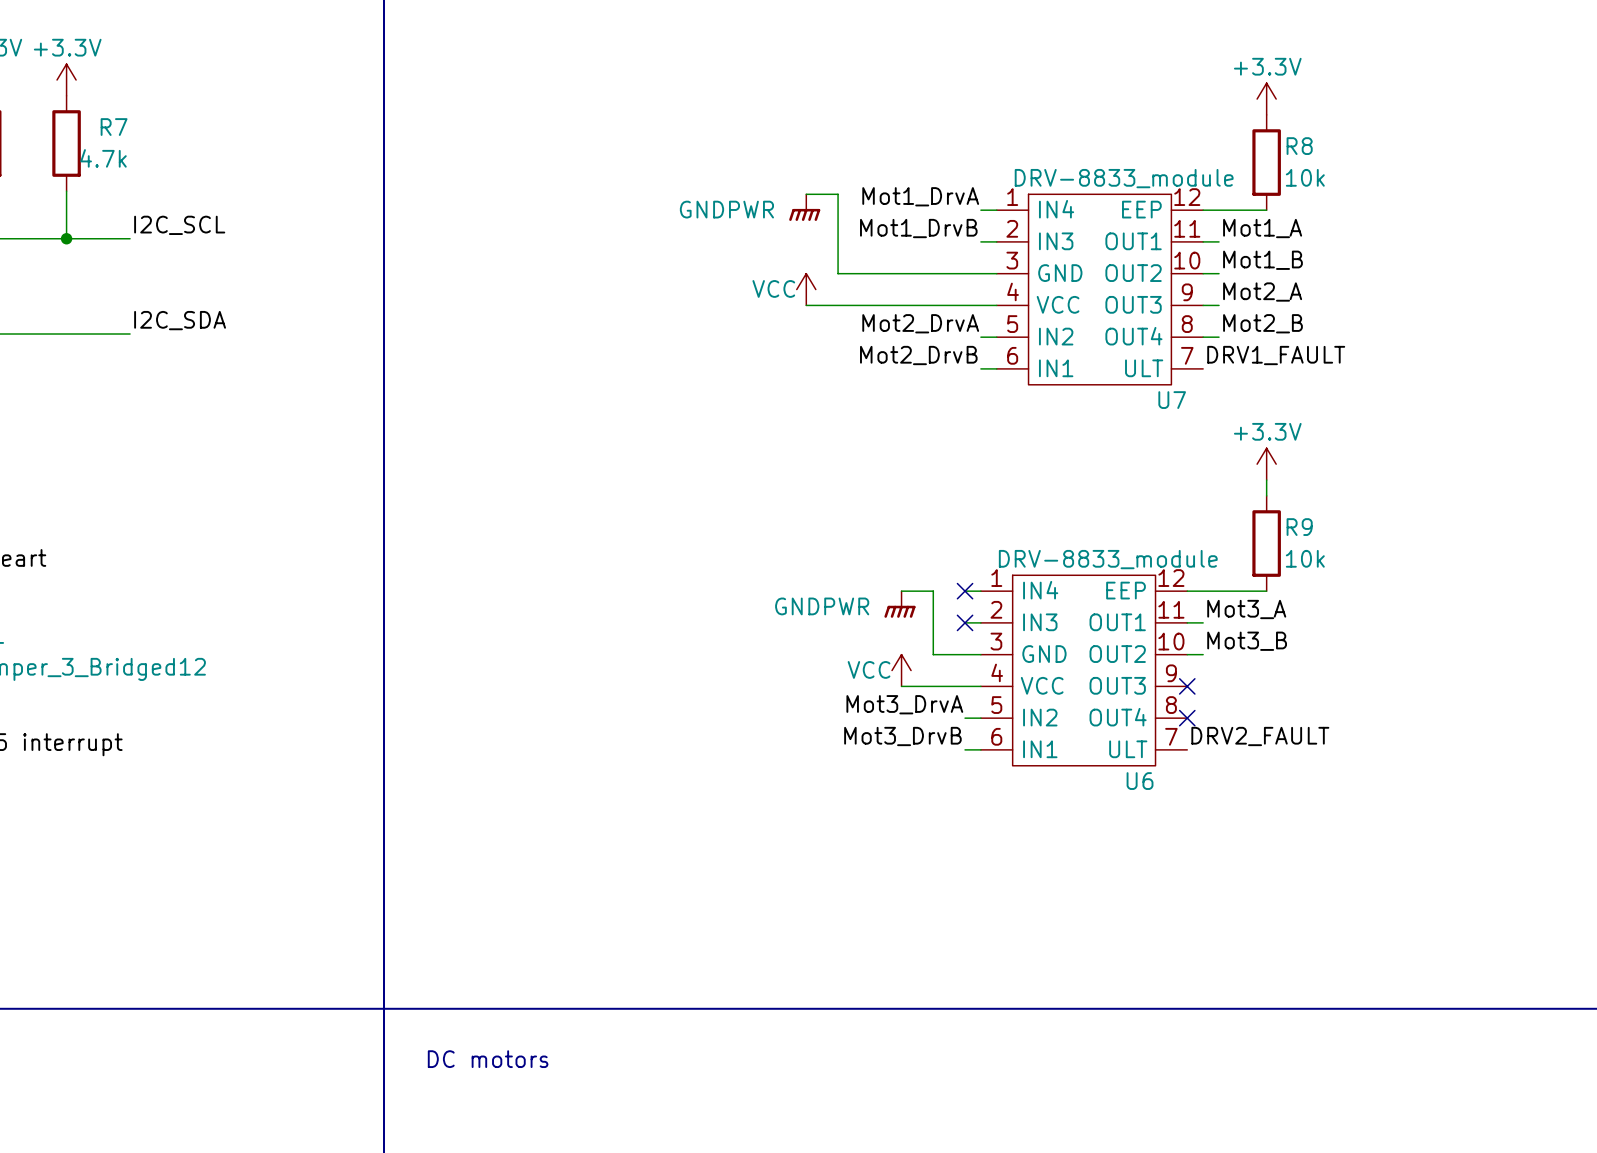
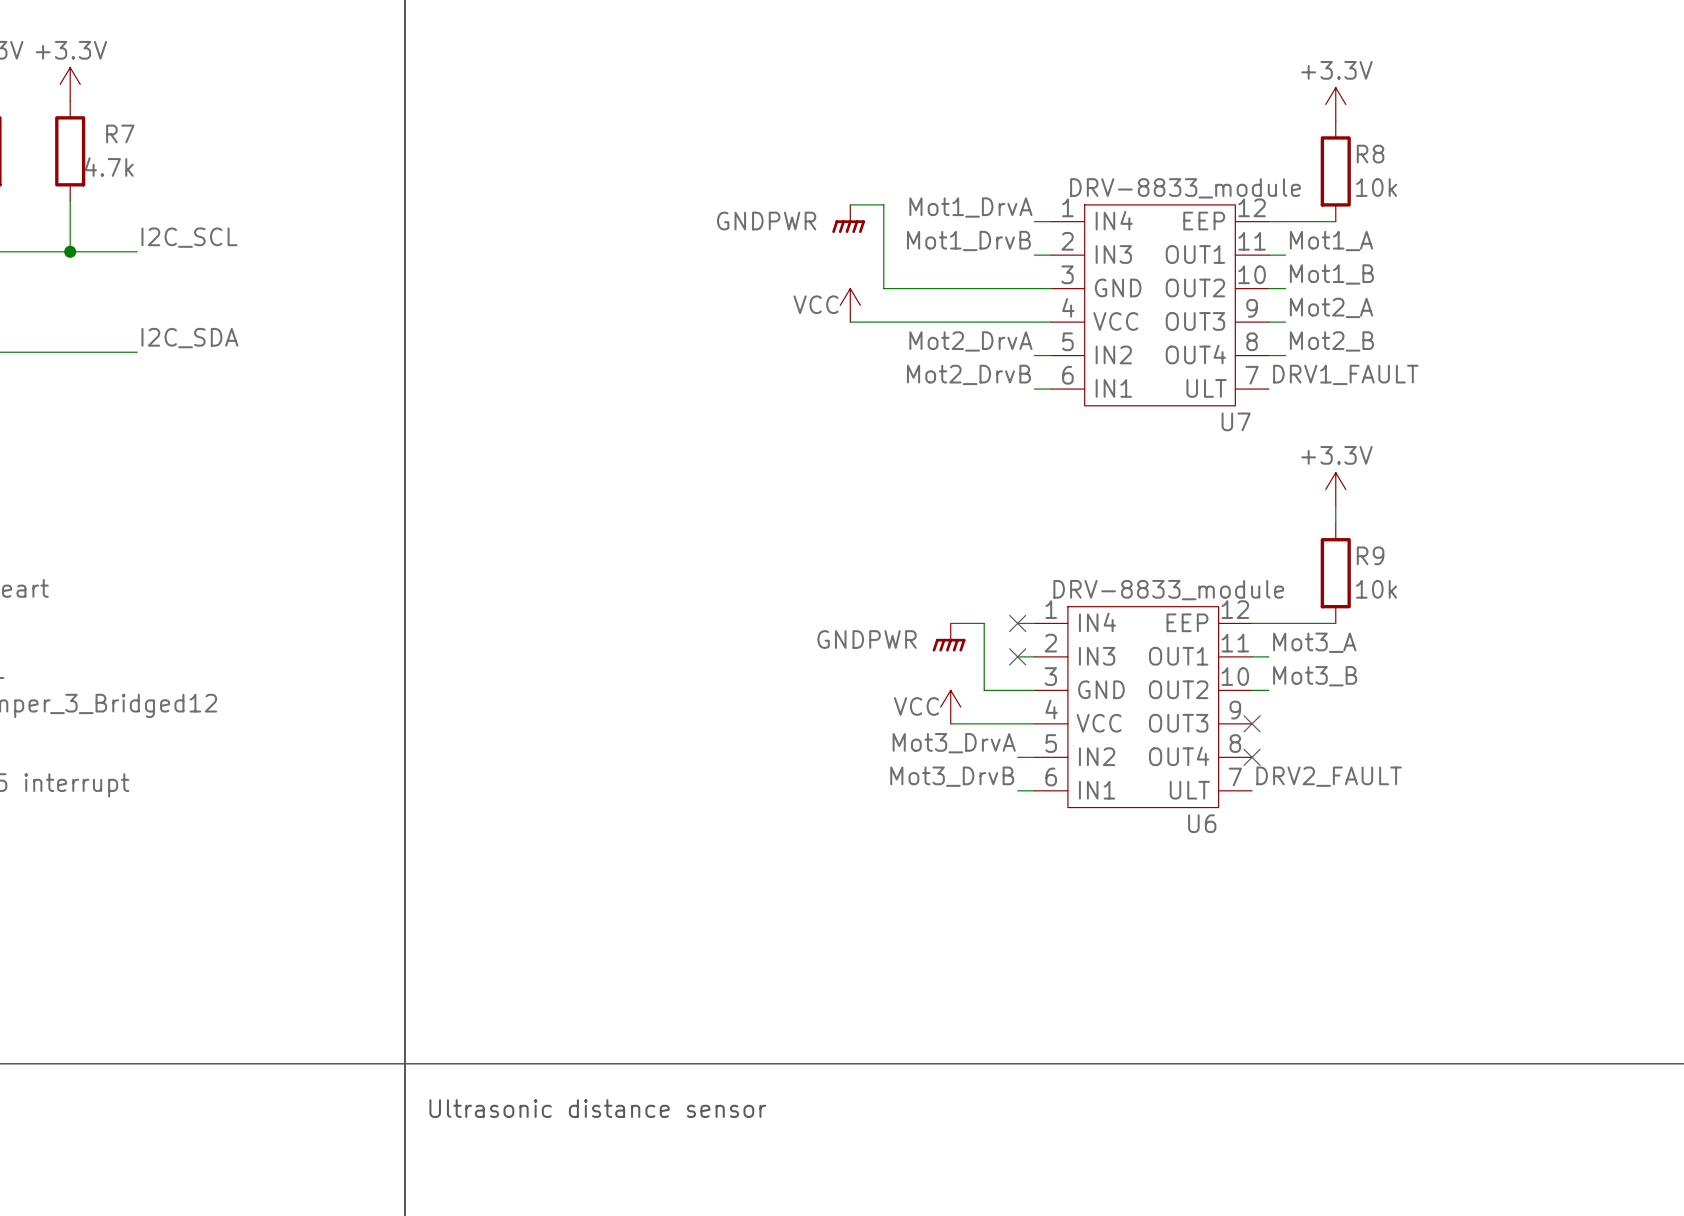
text: none -> Ultrasonic distance sensor (597, 1108)
text: DC motors (488, 1059) -> none

